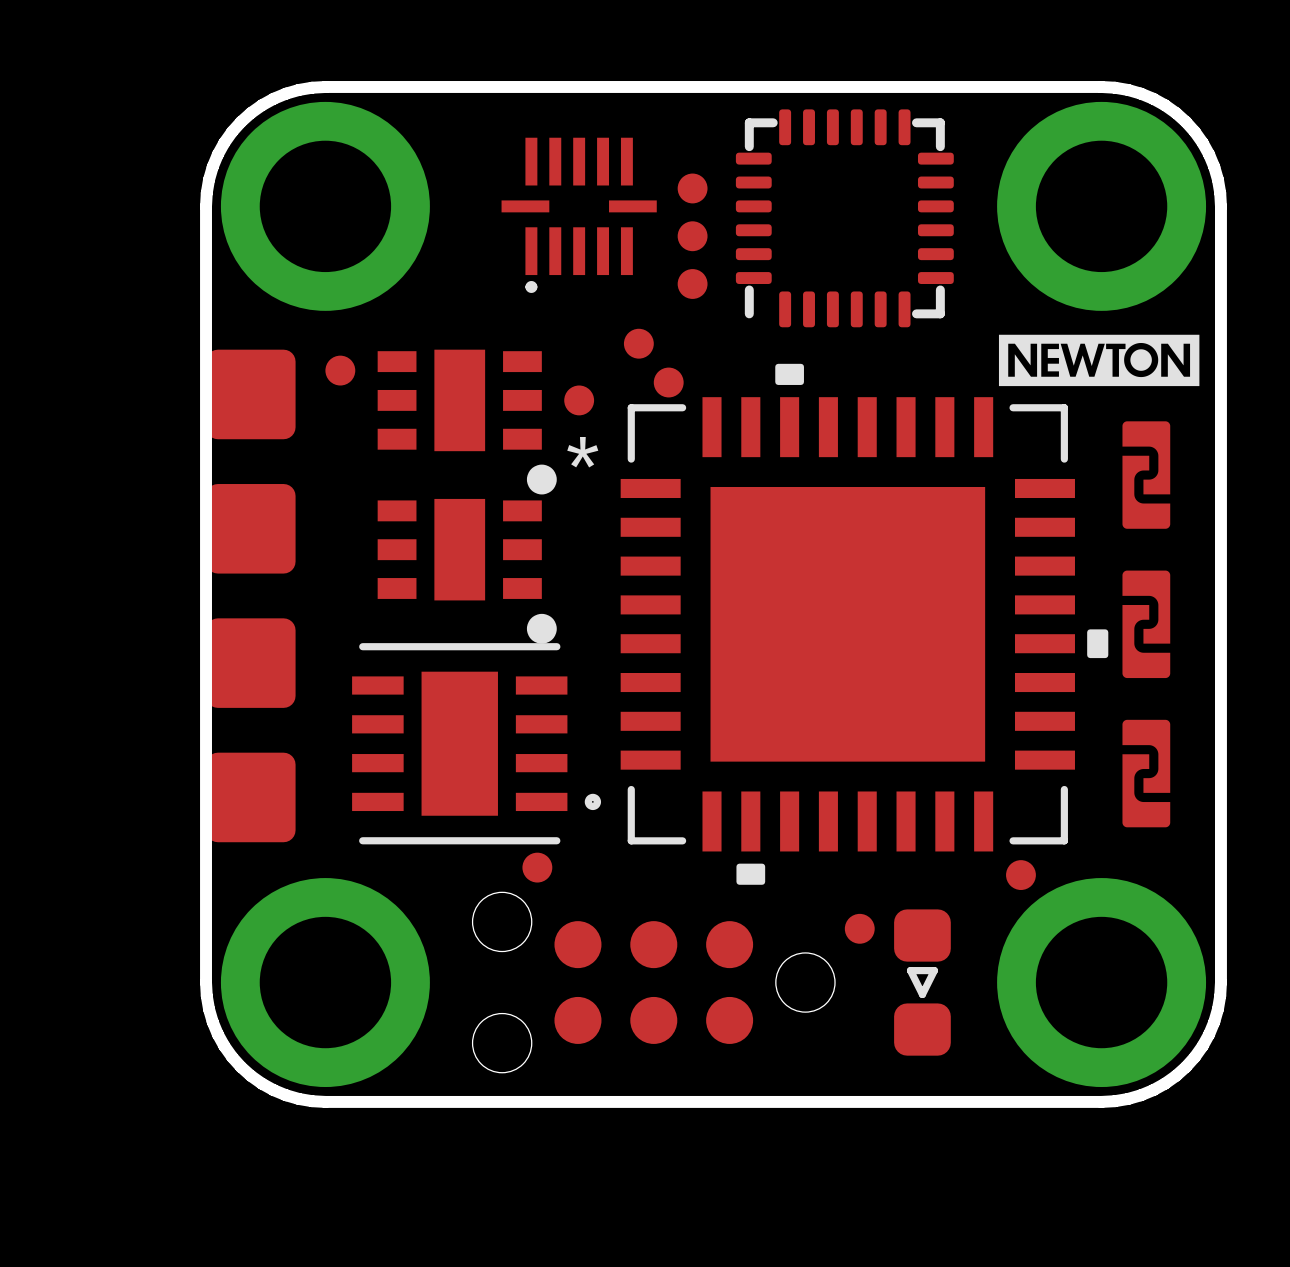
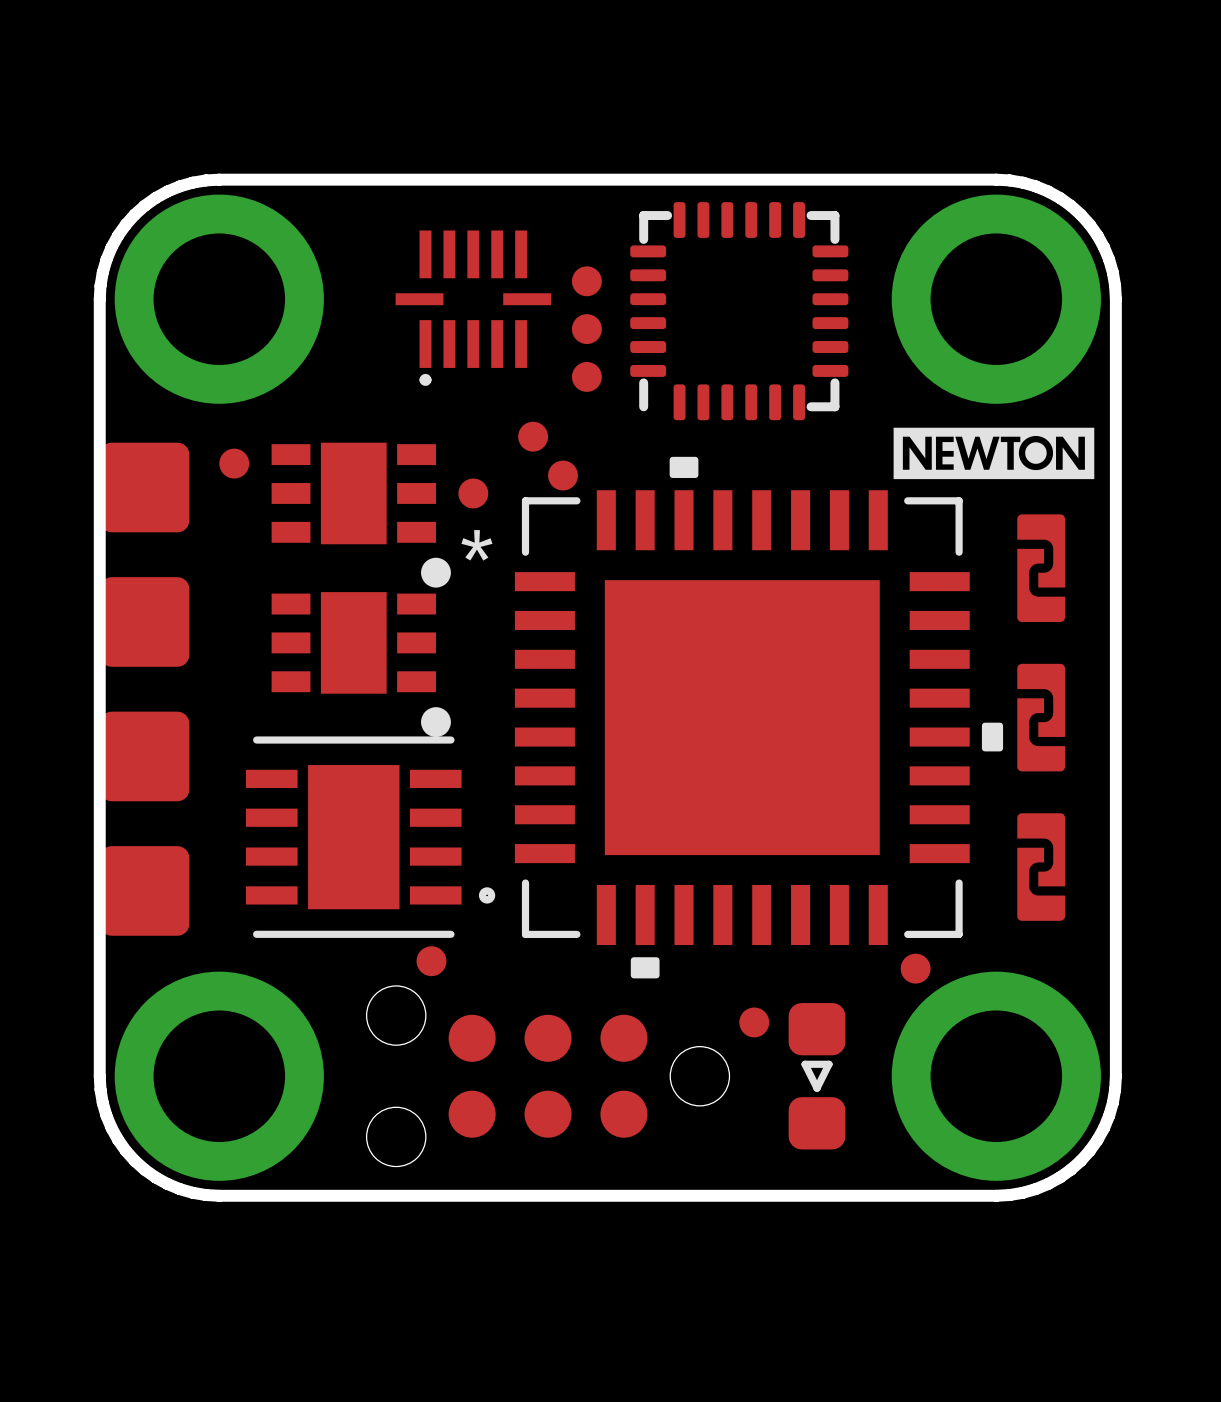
part footprint: [377, 349, 557, 495] -> [271, 442, 451, 588]
part footprint: [377, 498, 557, 644] -> [271, 592, 451, 738]
part footprint: [352, 643, 602, 845] -> [245, 736, 496, 938]

